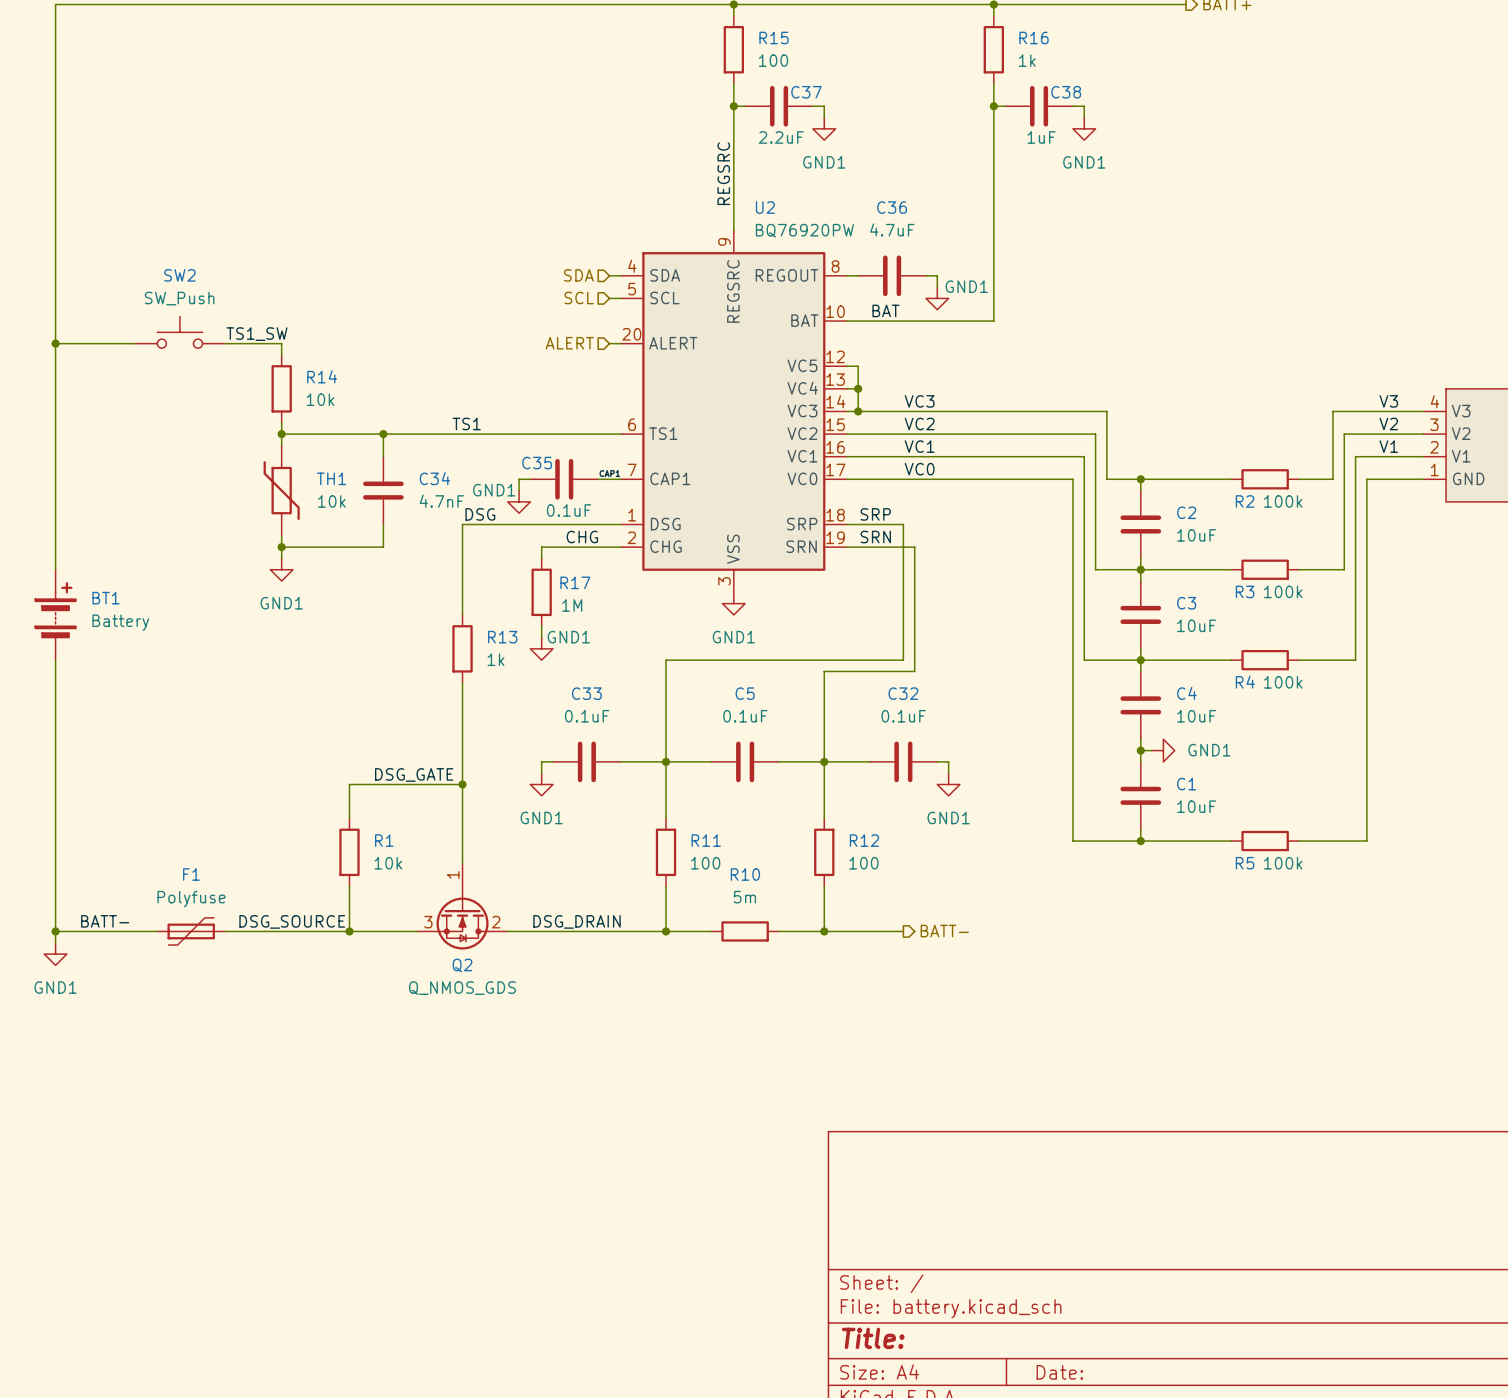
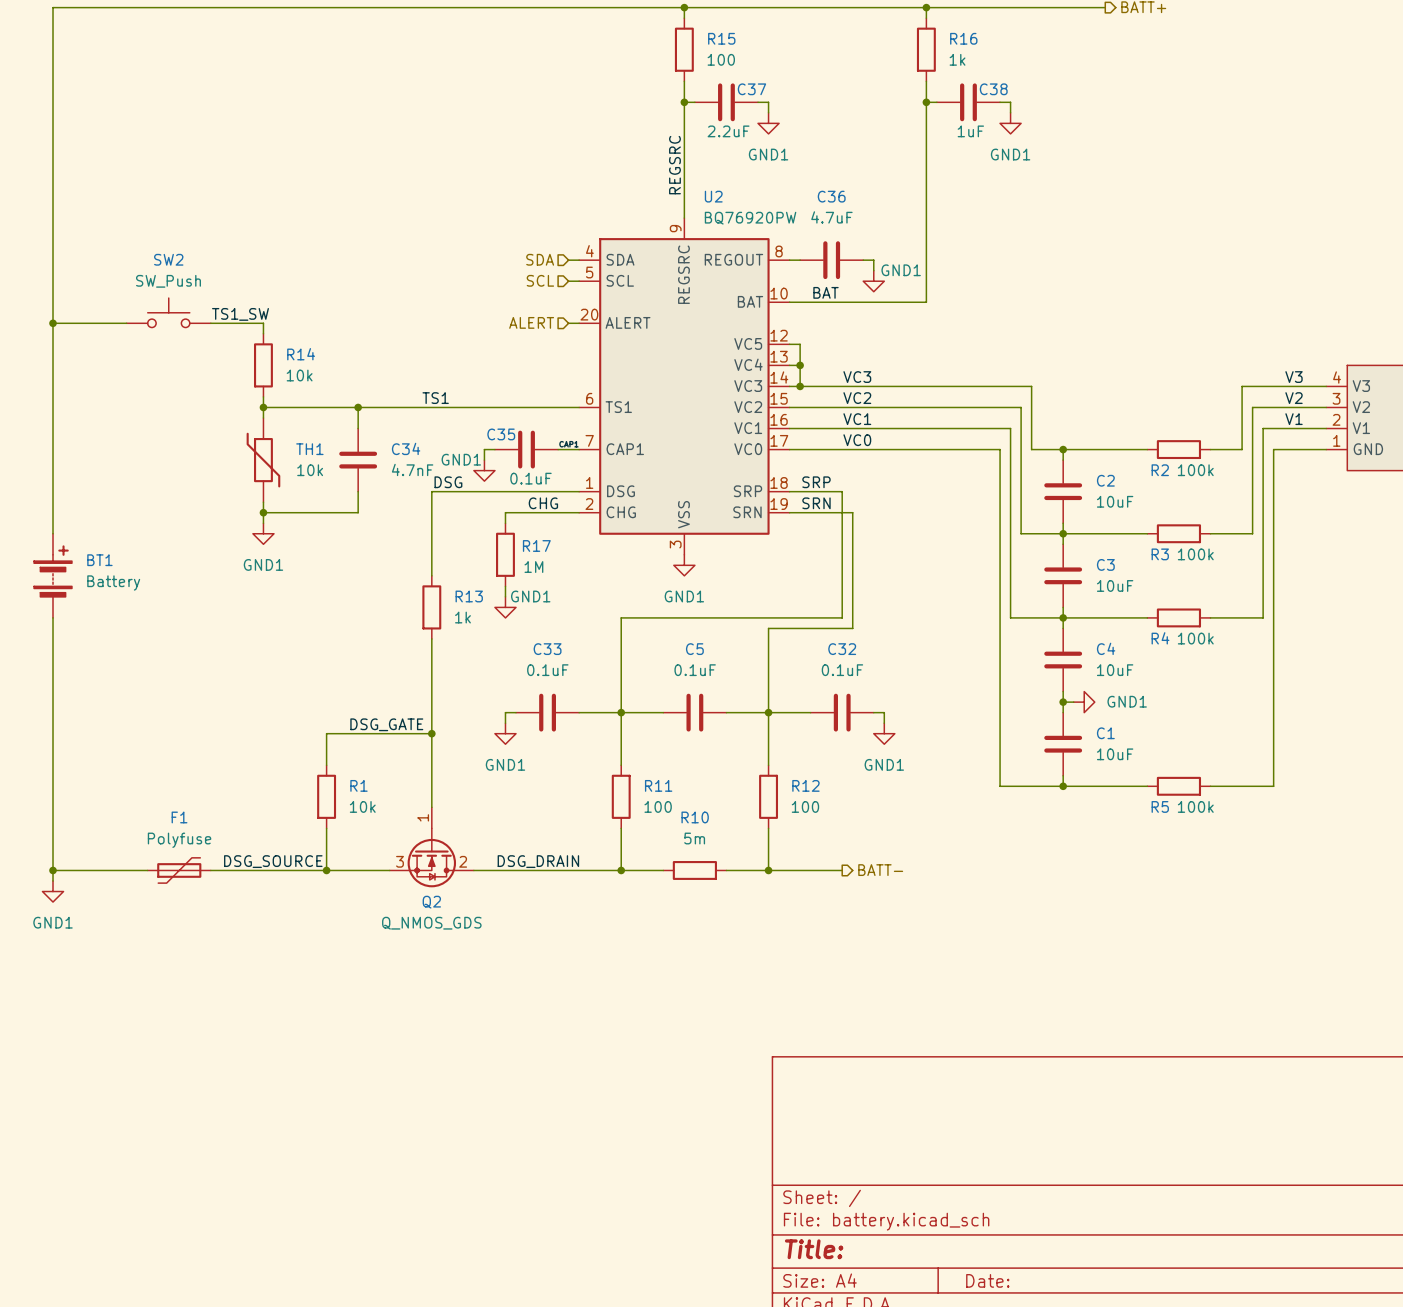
label: BATT- (105, 921) -> none

